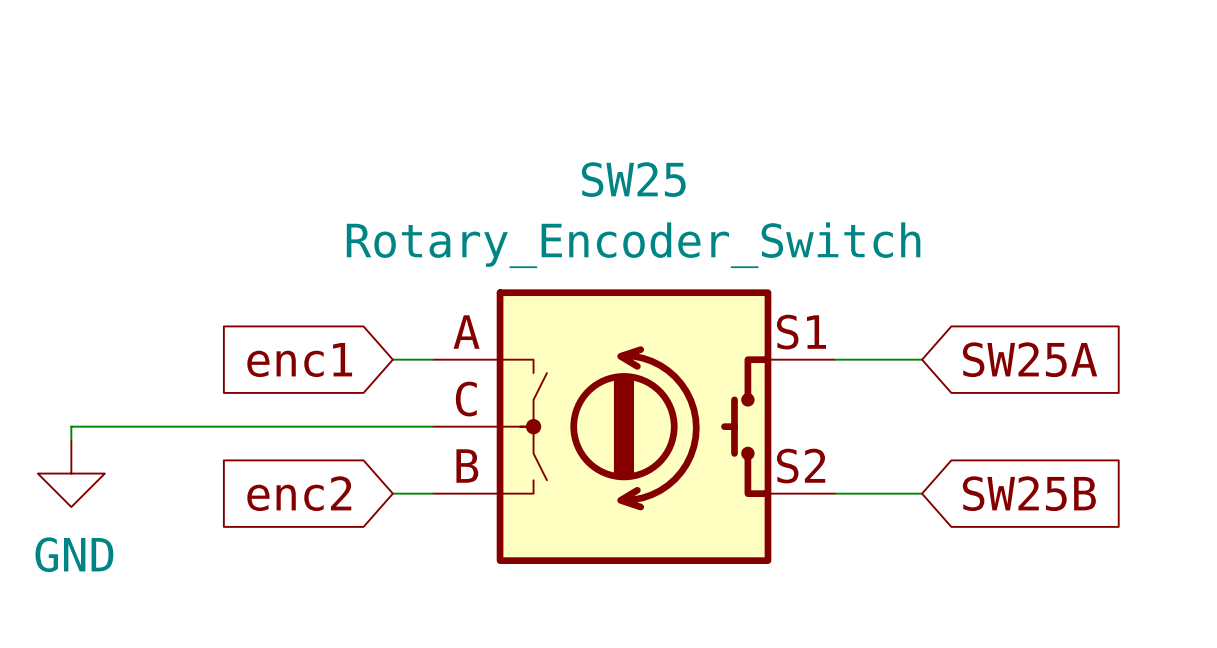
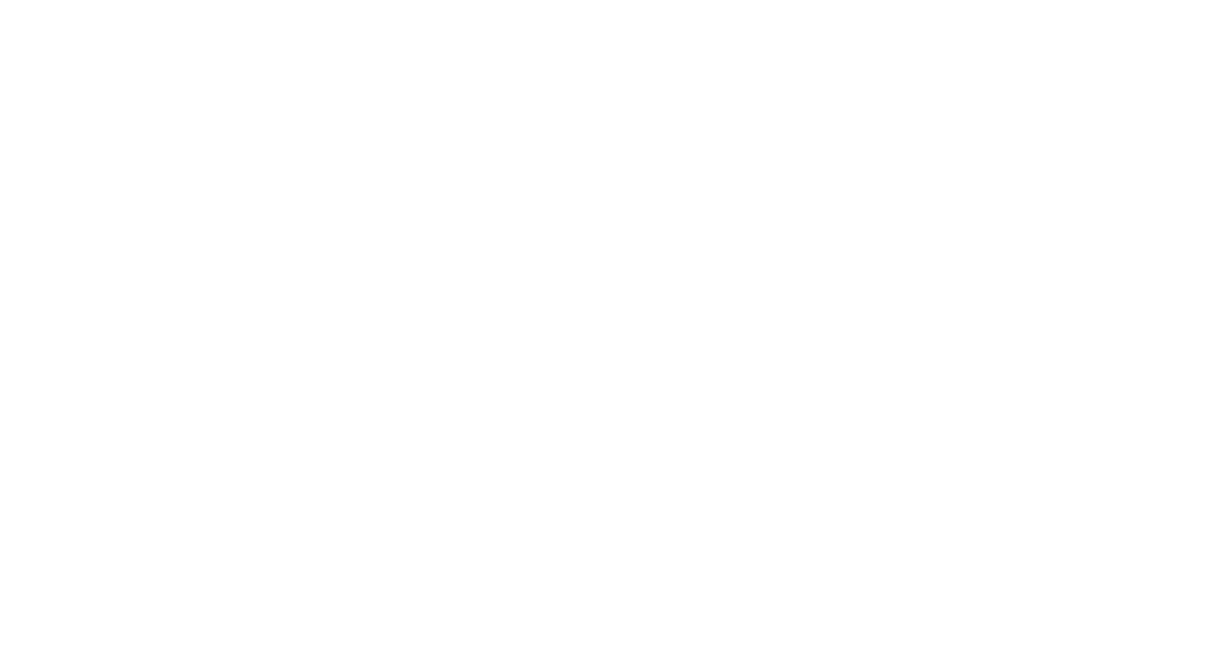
wire: (392, 359) (433, 359) -> none
wire: (834, 359) (922, 359) -> none
global label: SW25A (1030, 359) -> none
global label: enc1 (299, 360) -> none
wire: (433, 426) (71, 426) (71, 440) -> none
SW25: Rotary_Encoder_Switch (634, 426) -> none
power symbol: GND (71, 473) -> none
global label: enc2 (299, 493) -> none
wire: (392, 493) (433, 493) -> none
wire: (834, 493) (922, 493) -> none
global label: SW25B (1029, 493) -> none

